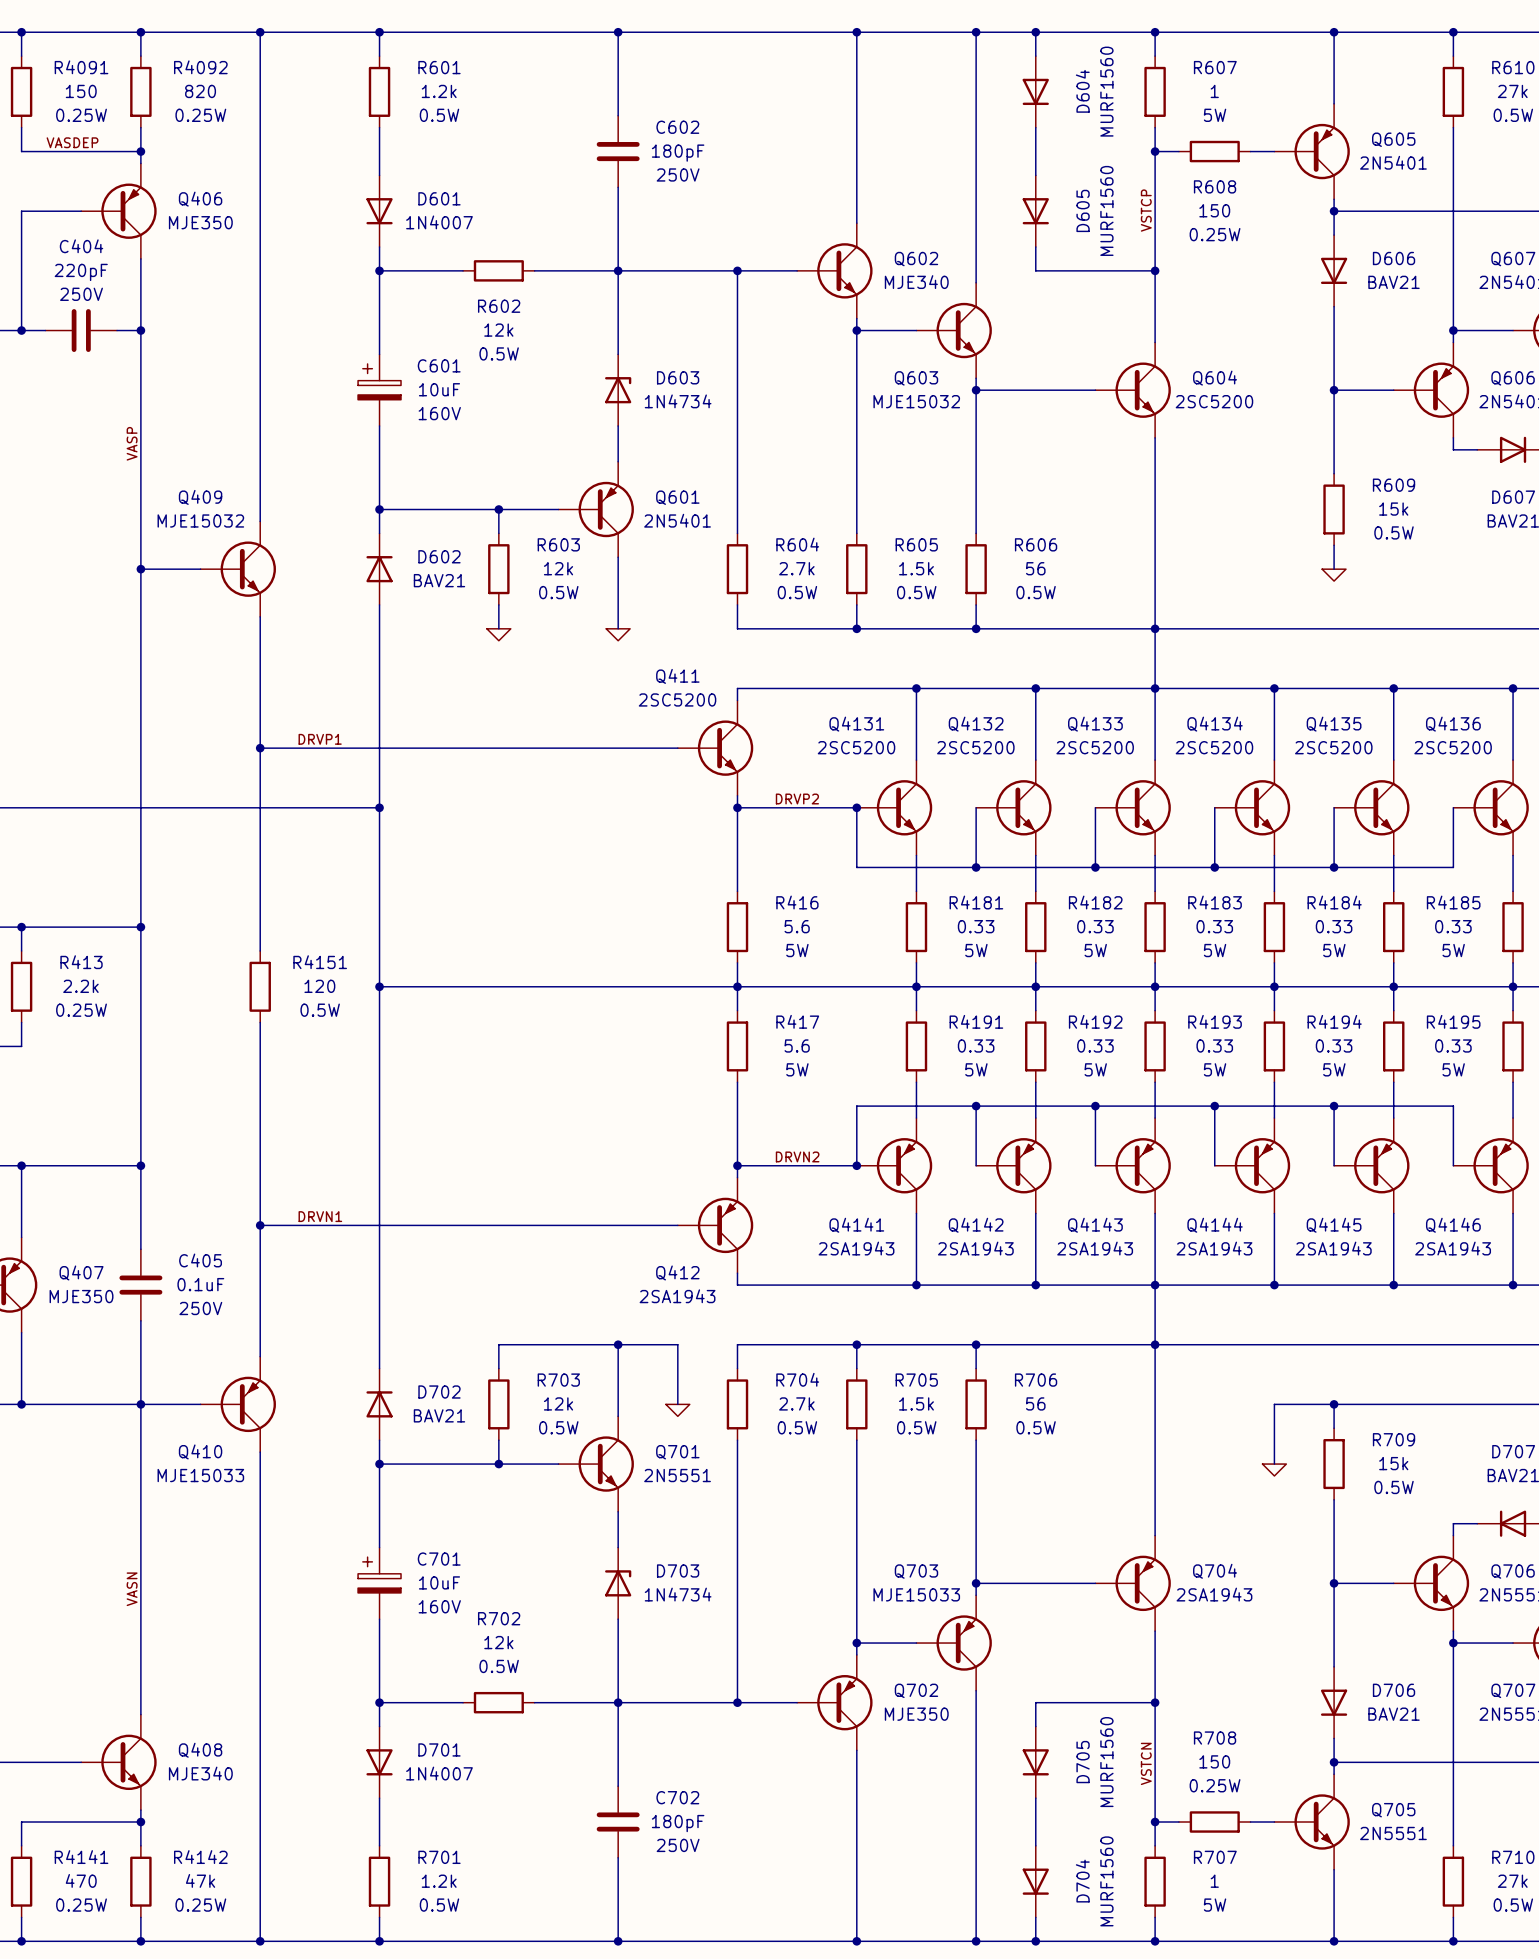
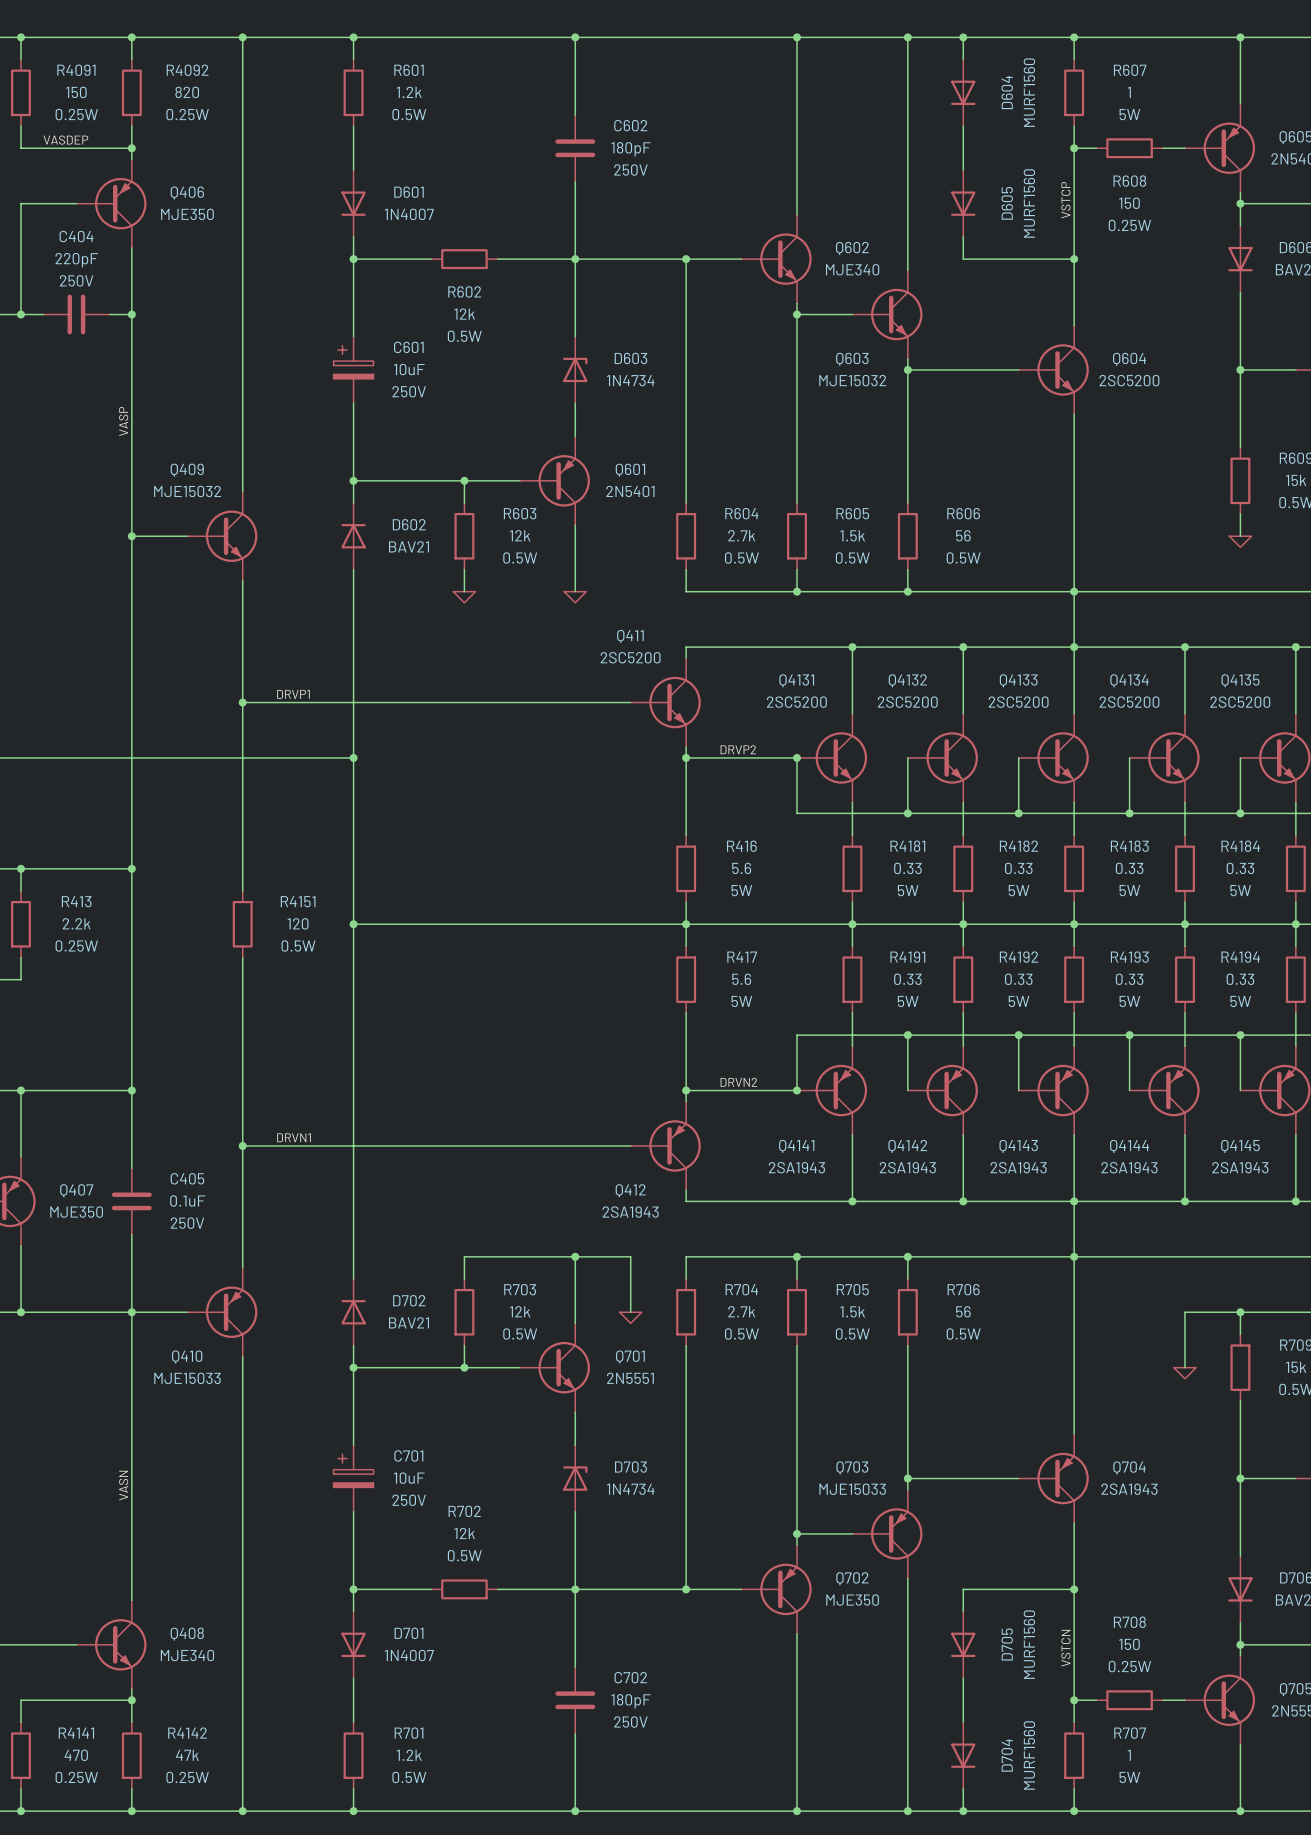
C601 text: 160V (439, 413) -> 250V (409, 391)
C701 text: 160V (439, 1606) -> 250V (409, 1500)

